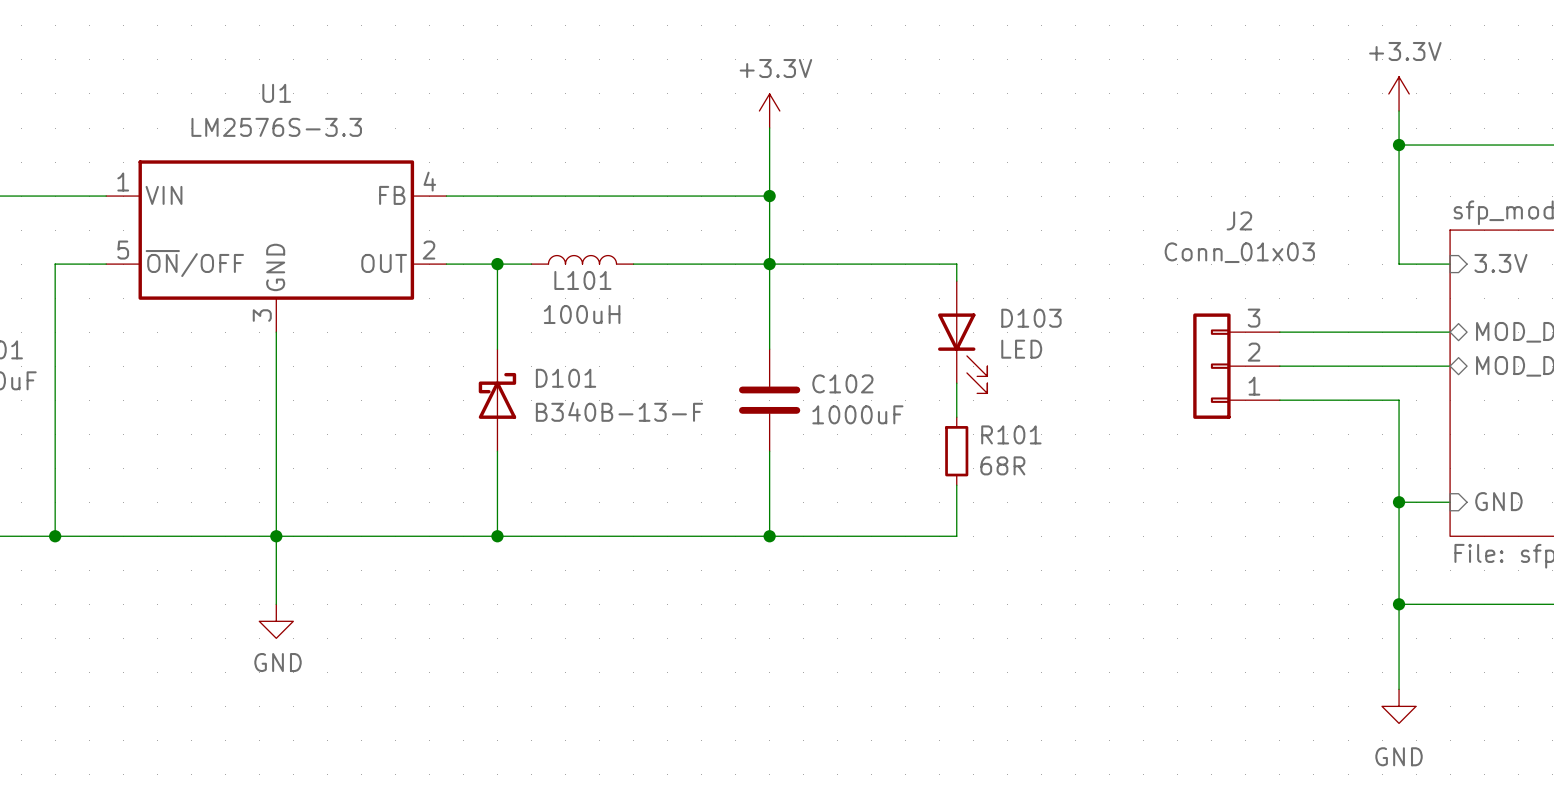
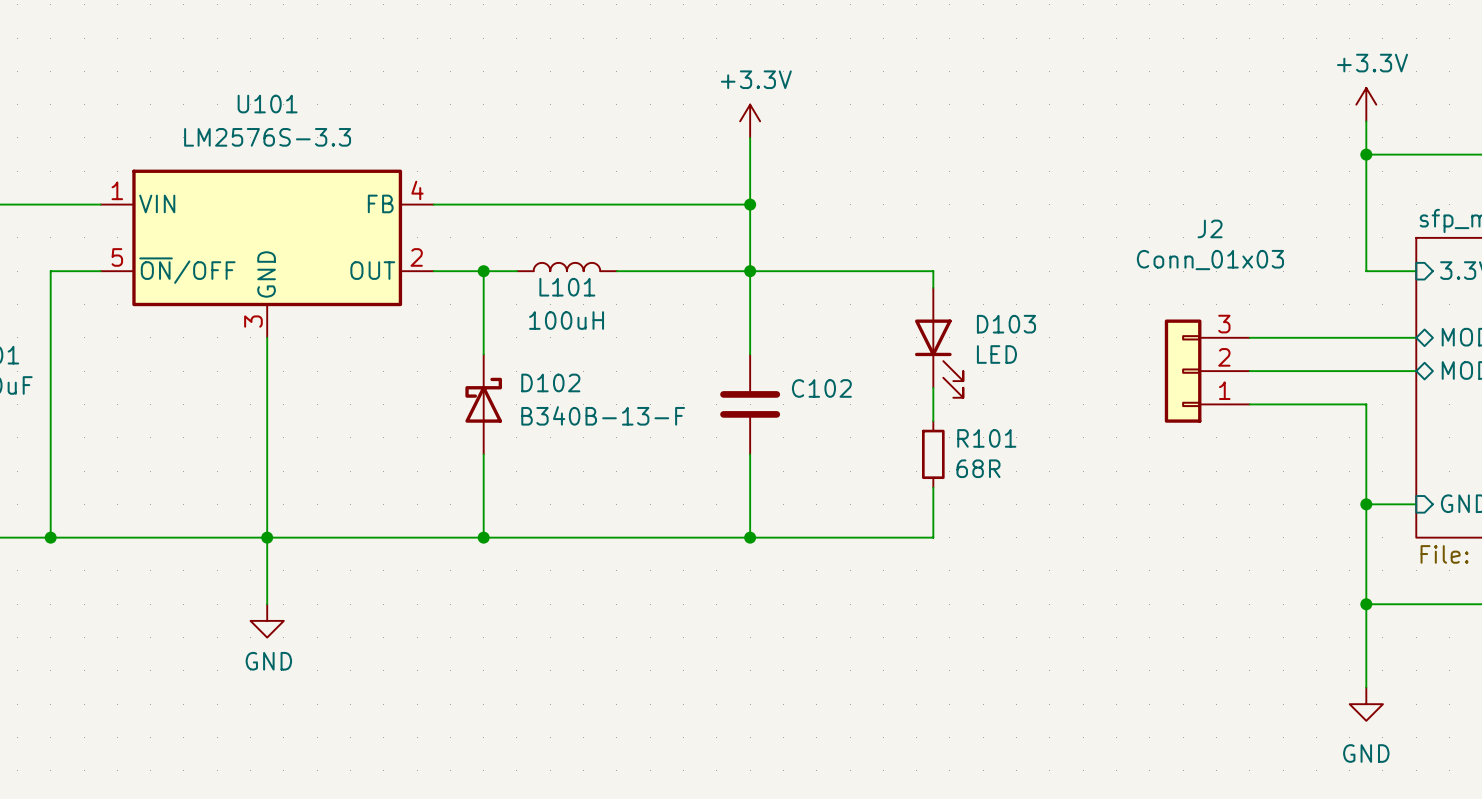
U1 name: U1 (276, 93) -> U101 (267, 104)
D101 name: D101 (566, 378) -> D102 (550, 382)
C102 value: 1000uF (857, 414) -> none

